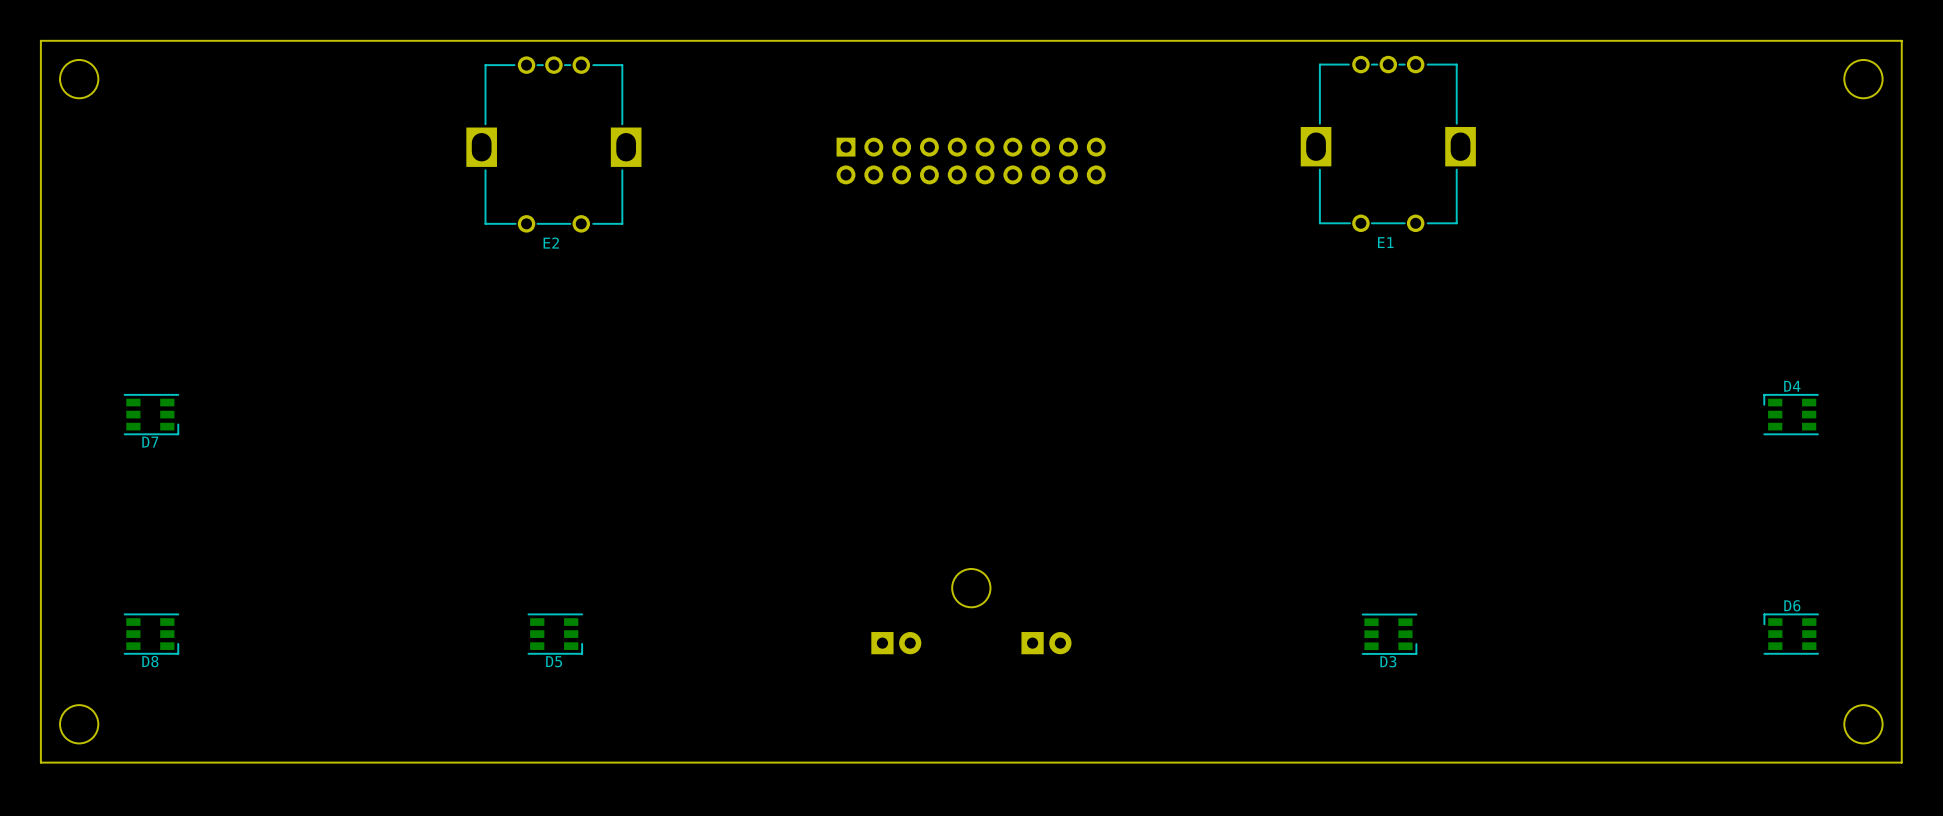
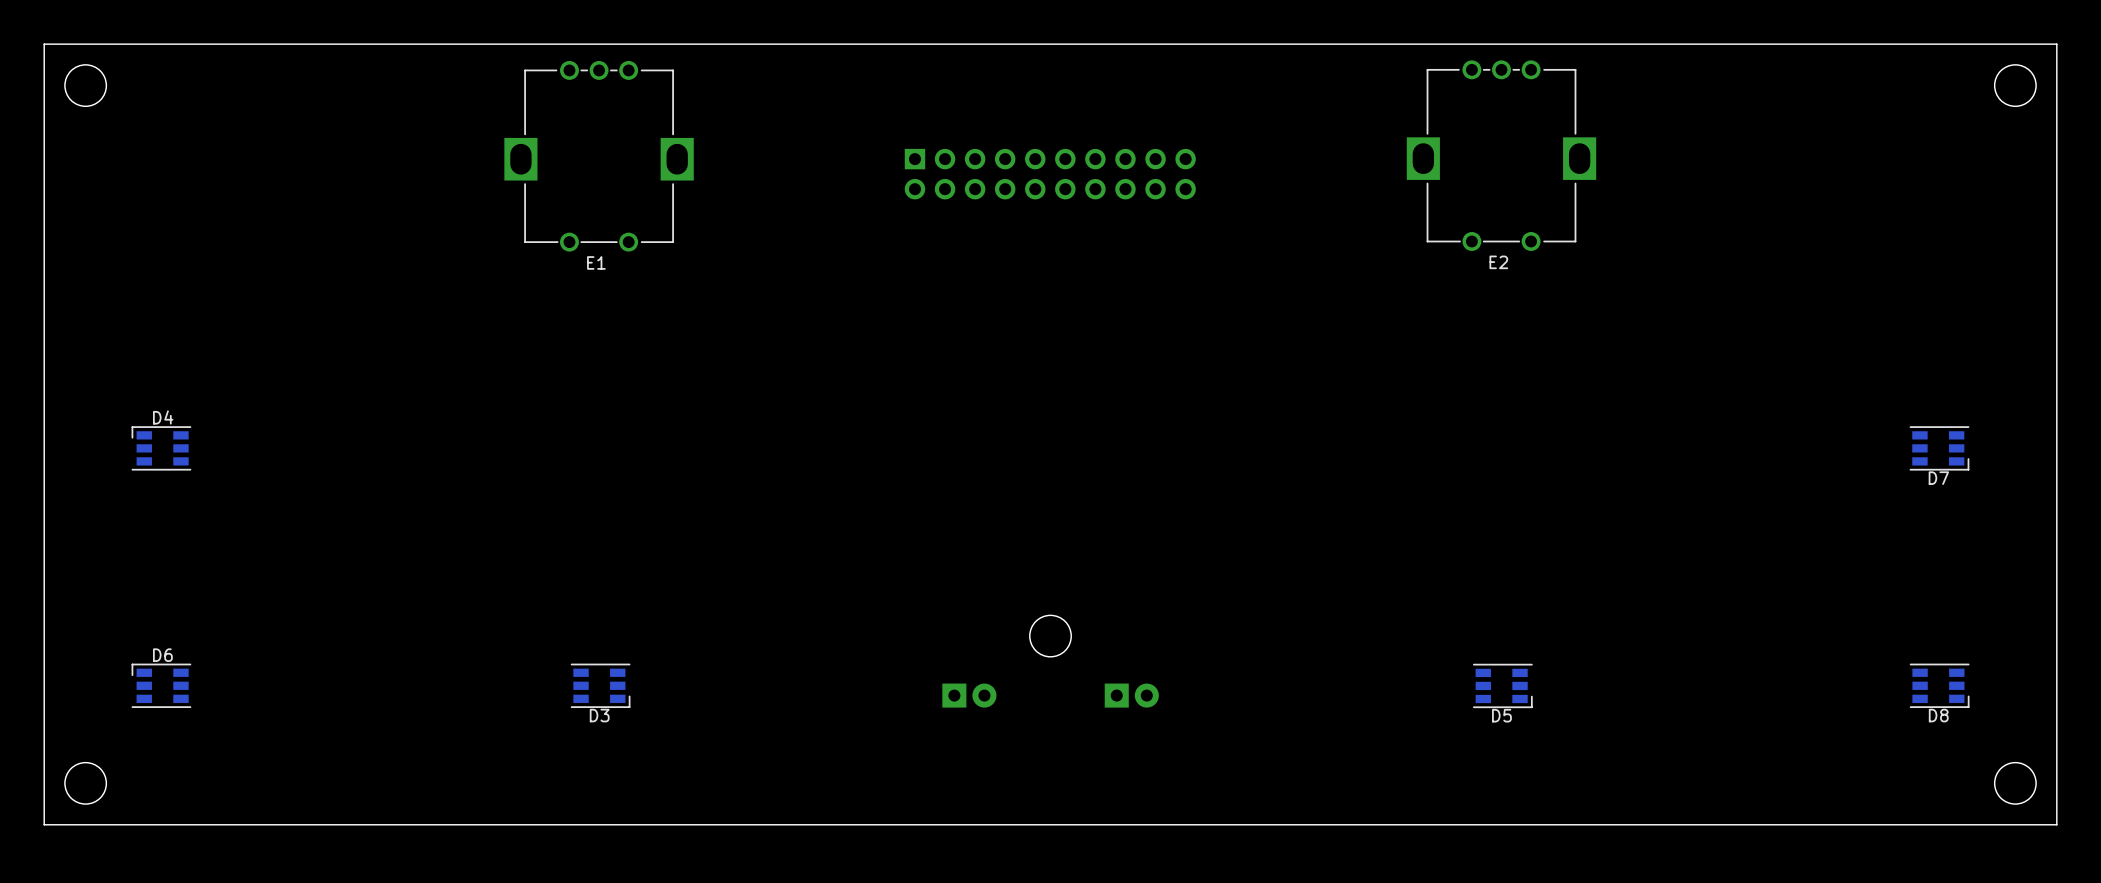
E1 name: E1 (1385, 242) -> E2 (1498, 262)
E2 name: E2 (551, 243) -> E1 (596, 262)
D7 position: (151, 414) -> (1939, 448)
D4 position: (1791, 414) -> (161, 448)
D8 position: (151, 634) -> (1939, 685)
D6 position: (1791, 634) -> (161, 685)
D5 name: D5 (554, 661) -> D3 (599, 715)
D3 name: D3 (1388, 661) -> D5 (1501, 715)

